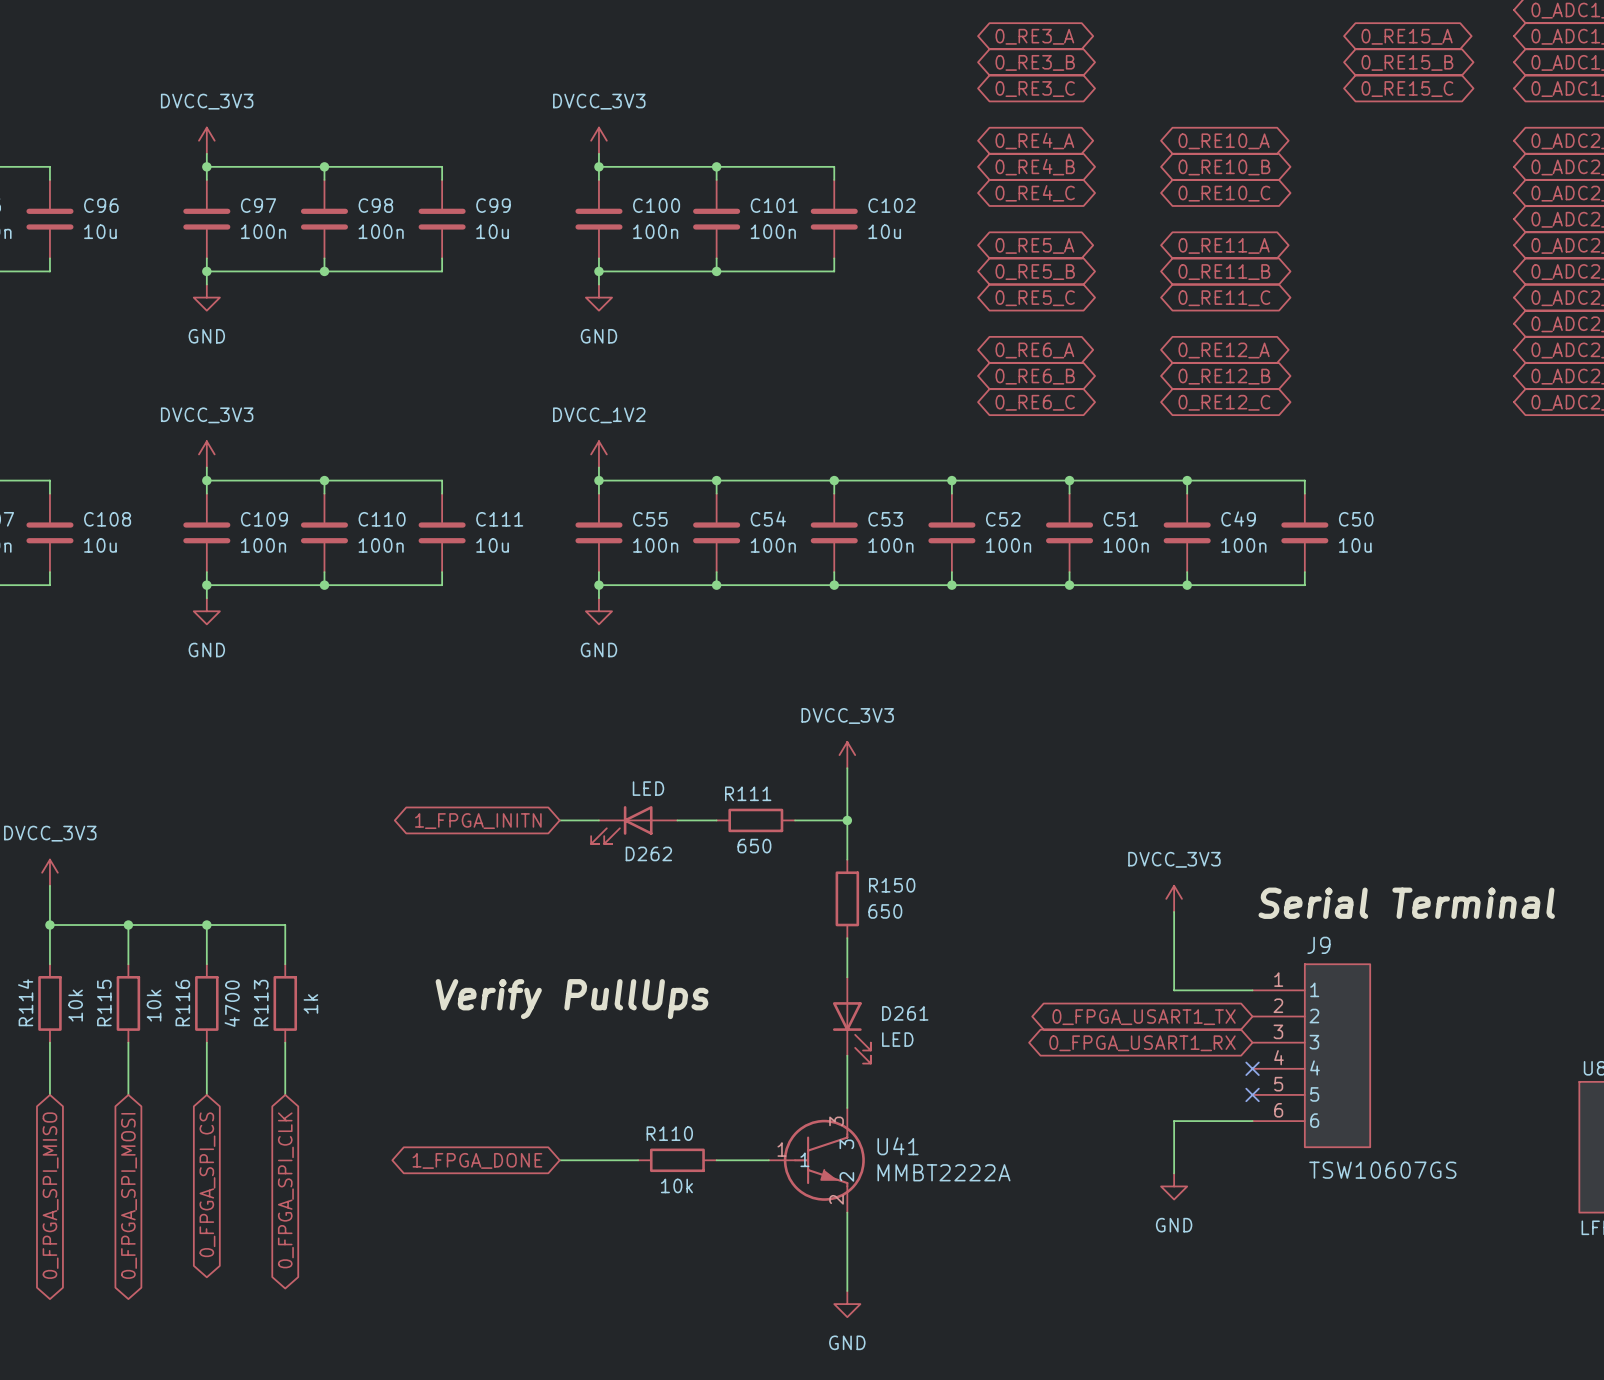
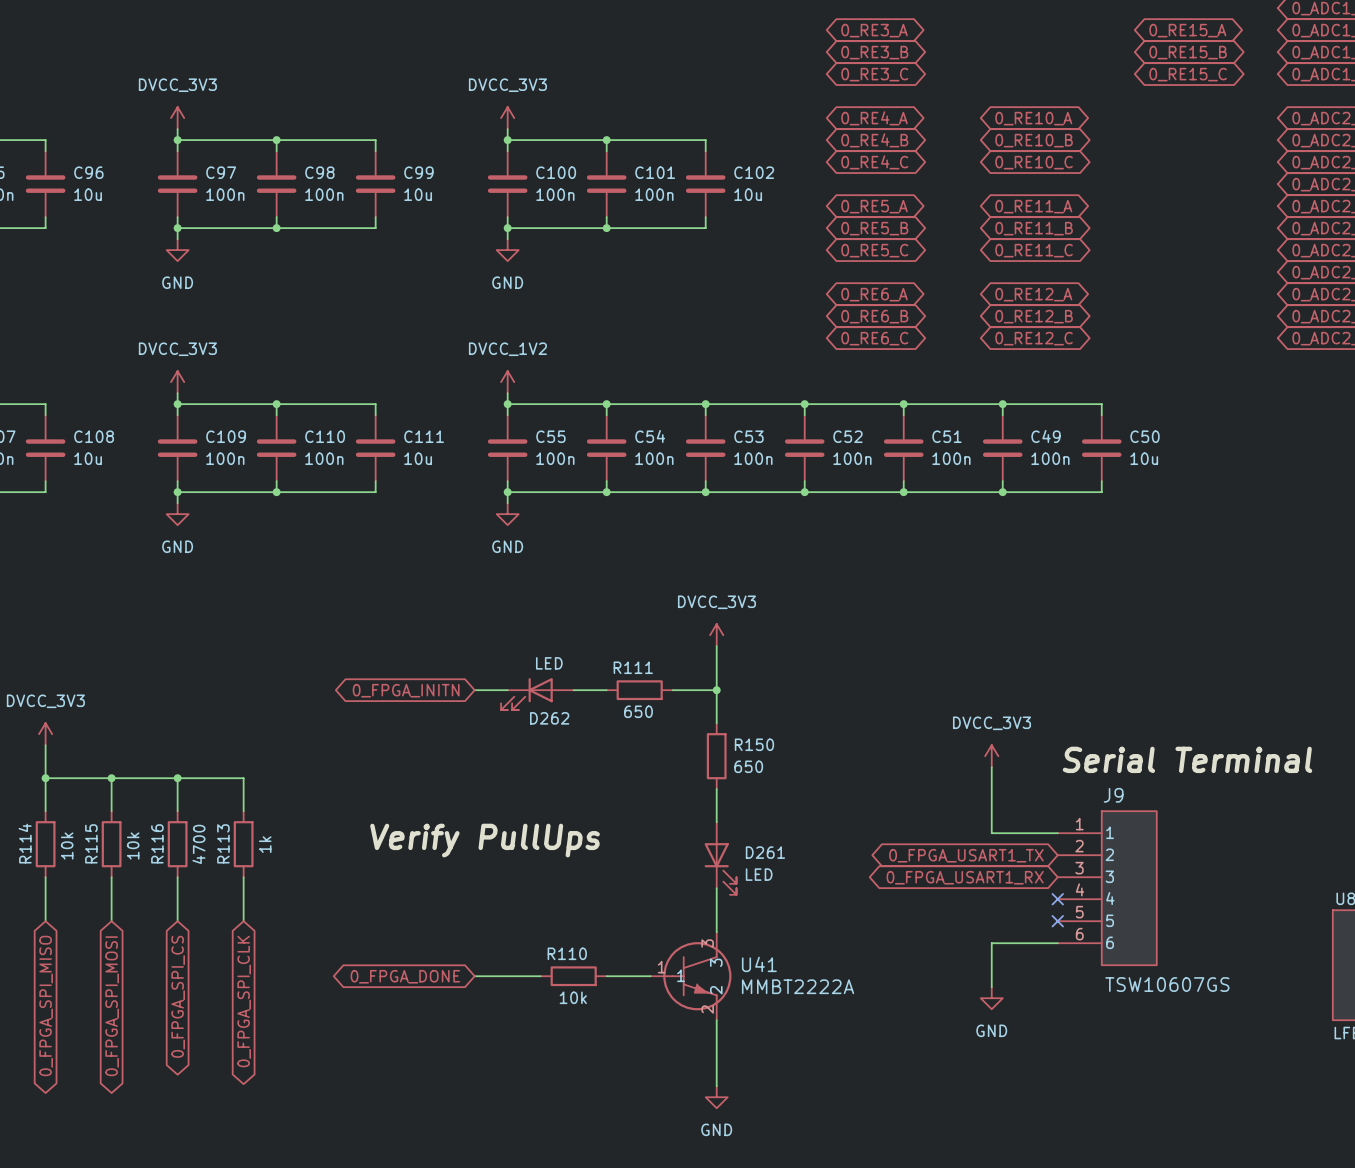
global label: 1_FPGA_INITN (478, 821) -> 0_FPGA_INITN (406, 690)
global label: 1_FPGA_DONE (477, 1160) -> 0_FPGA_DONE (405, 976)

